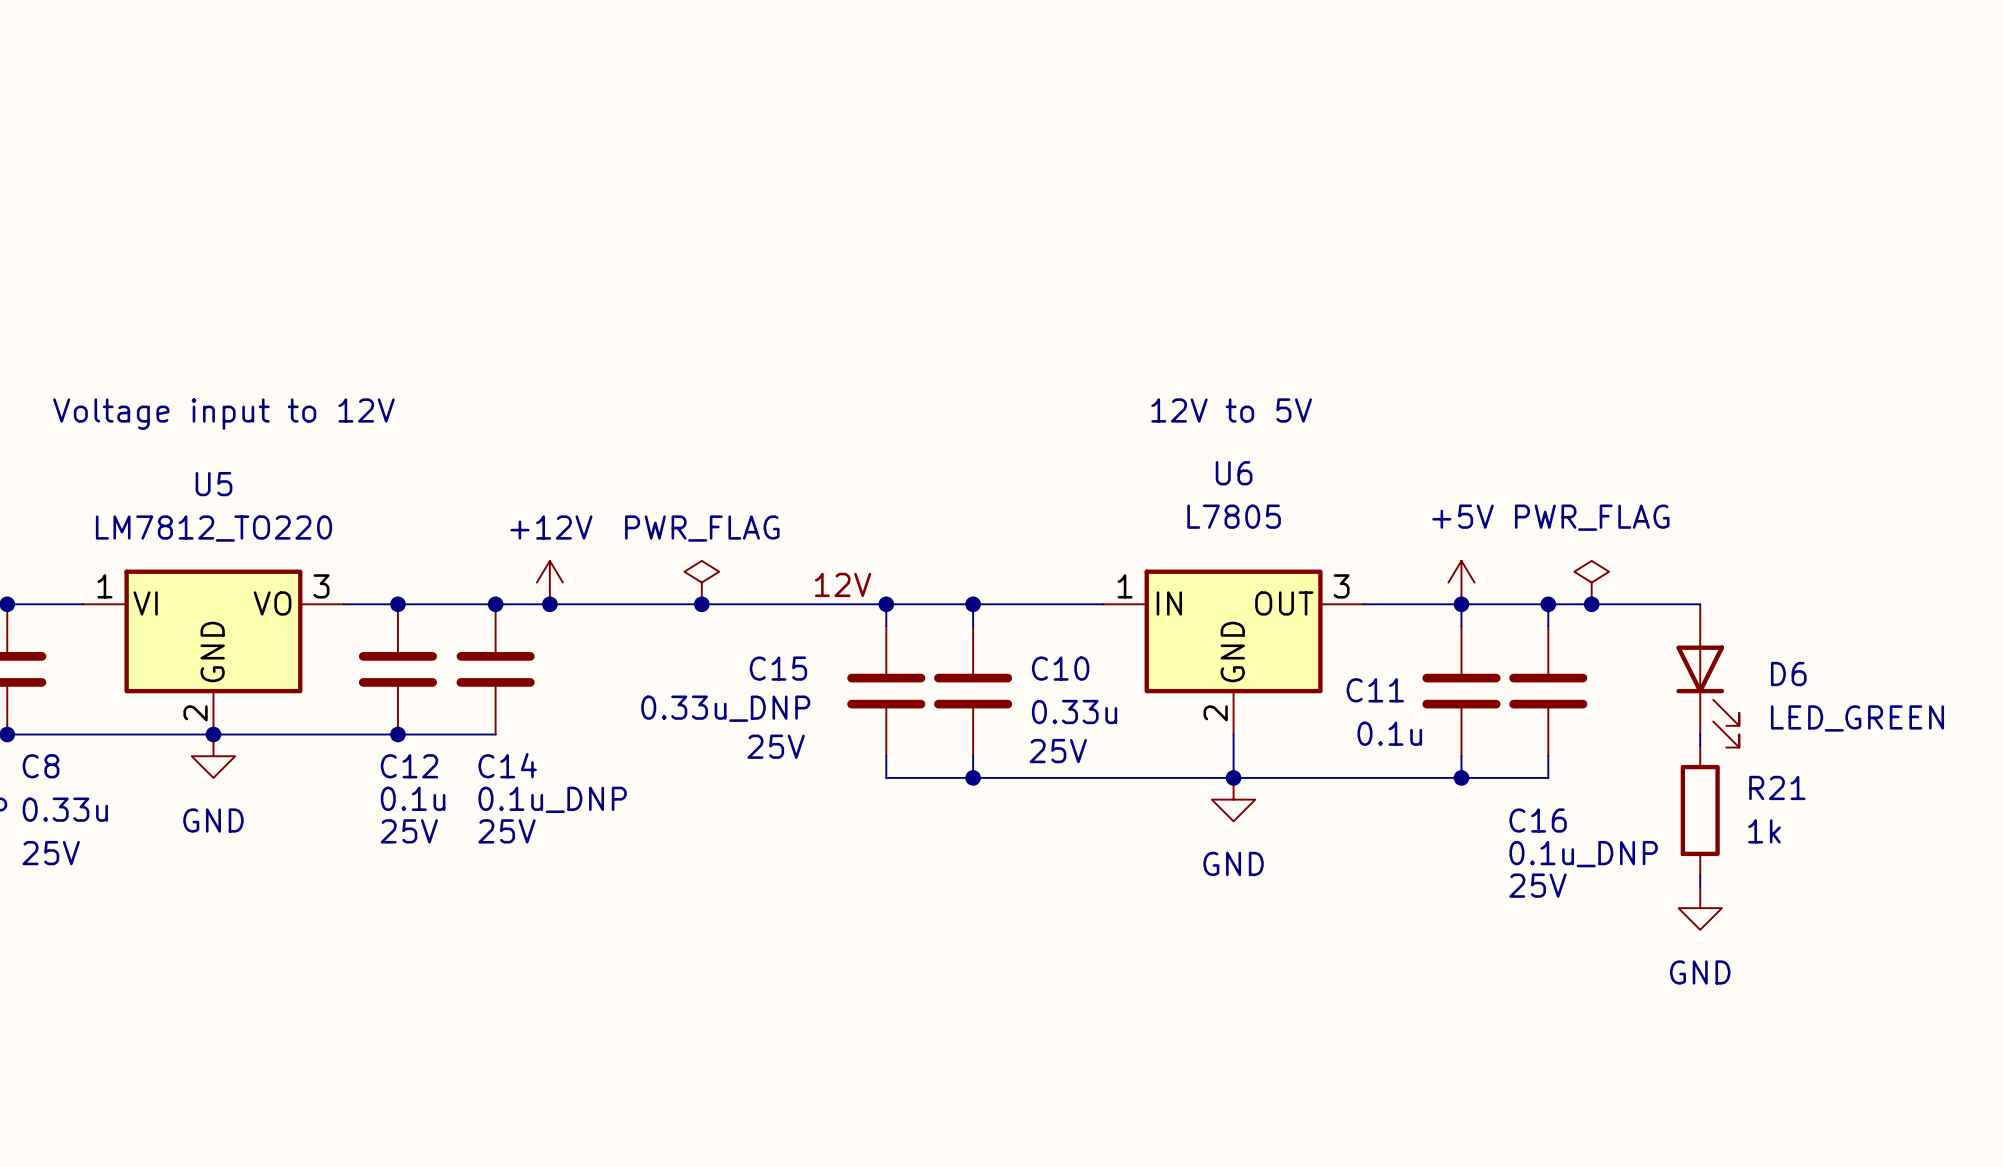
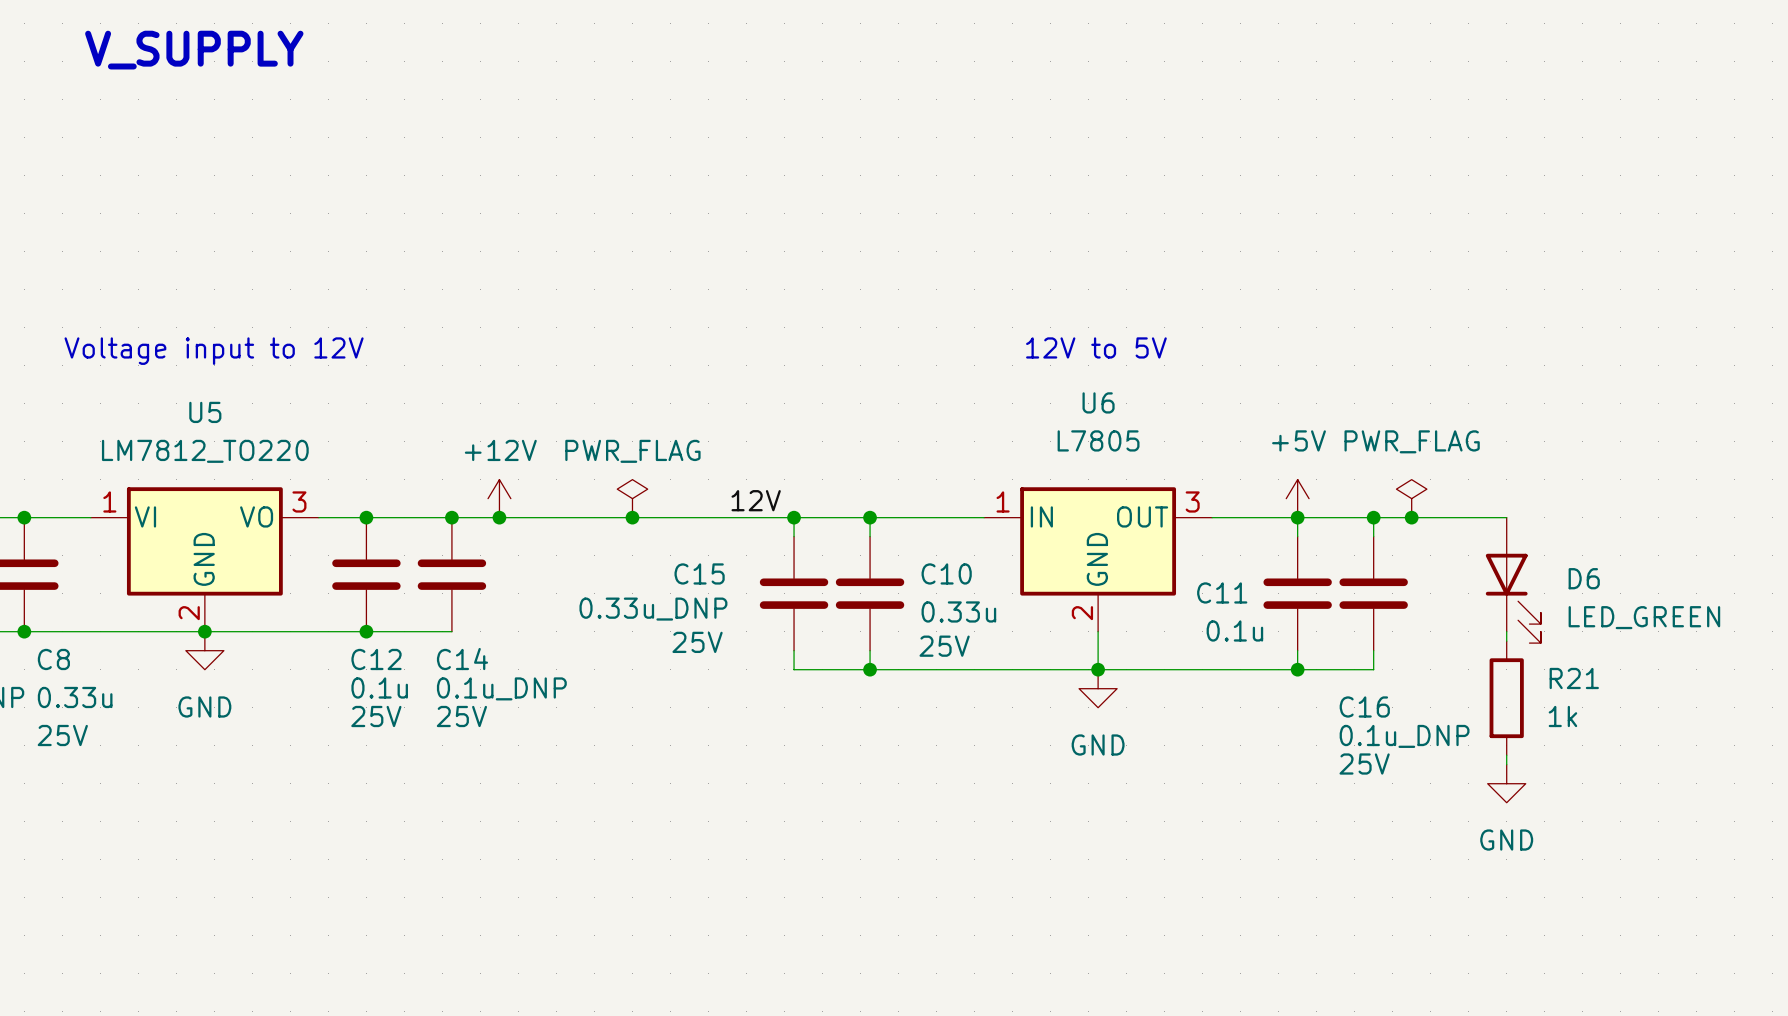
text: none -> V_SUPPLY (194, 50)

